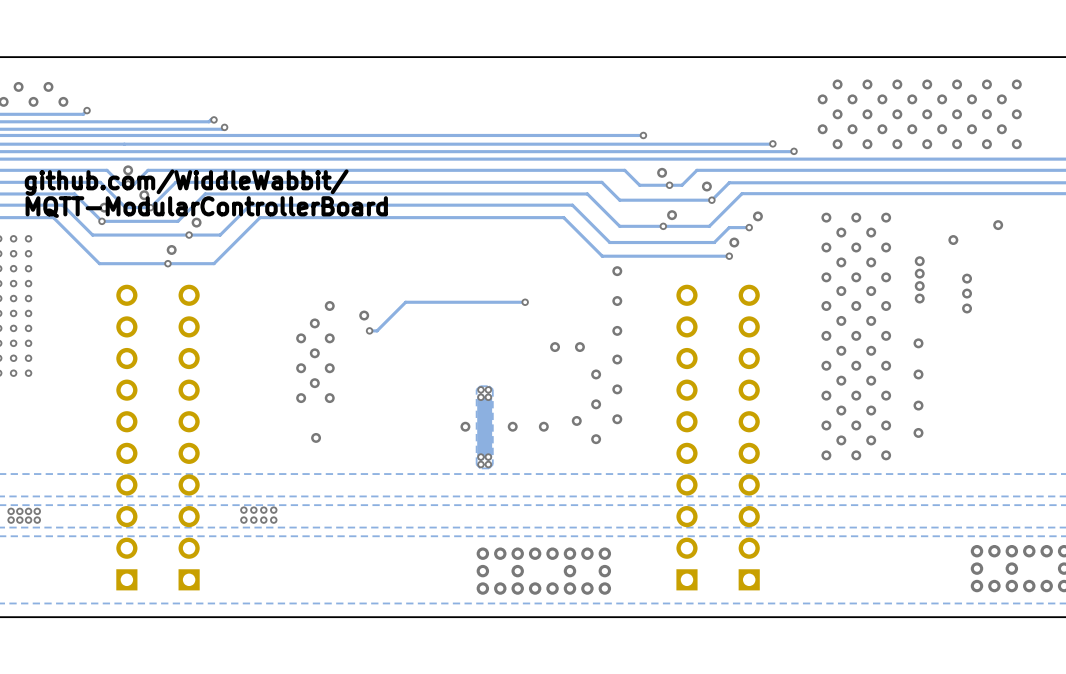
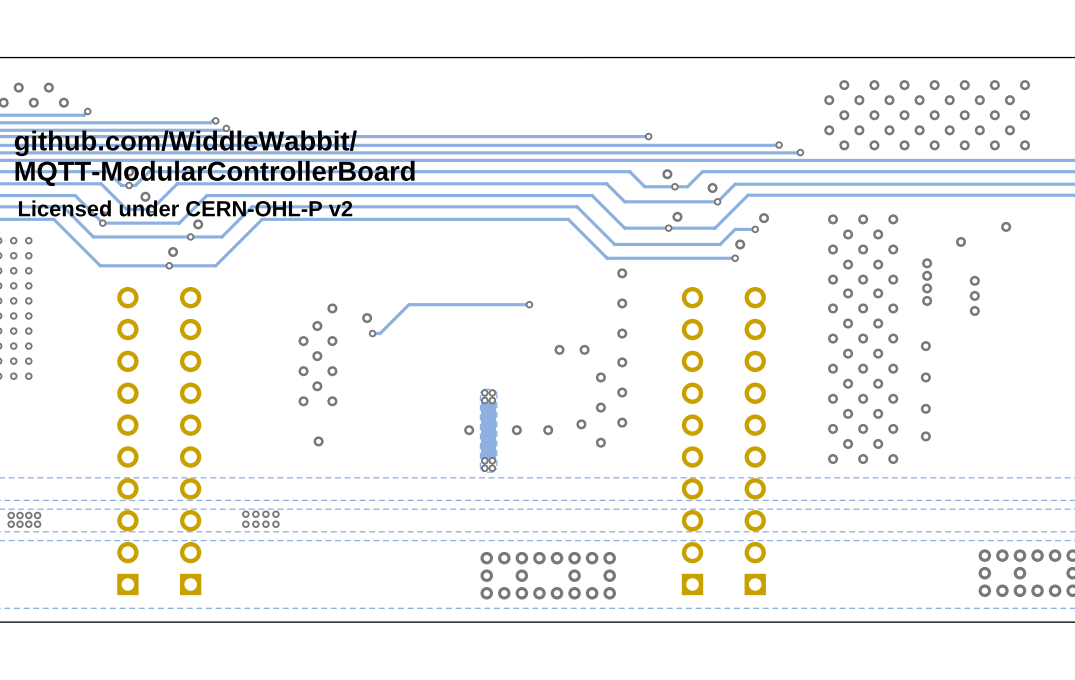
text: none -> github.com/WiddleWabbit/ (185, 143)
text: github.com/WiddleWabbit/ (186, 182) -> MQTT-ModularControllerBoard (215, 173)
text: MQTT-ModularControllerBoard (206, 207) -> Licensed under CERN-OHL-P v2 (185, 208)

